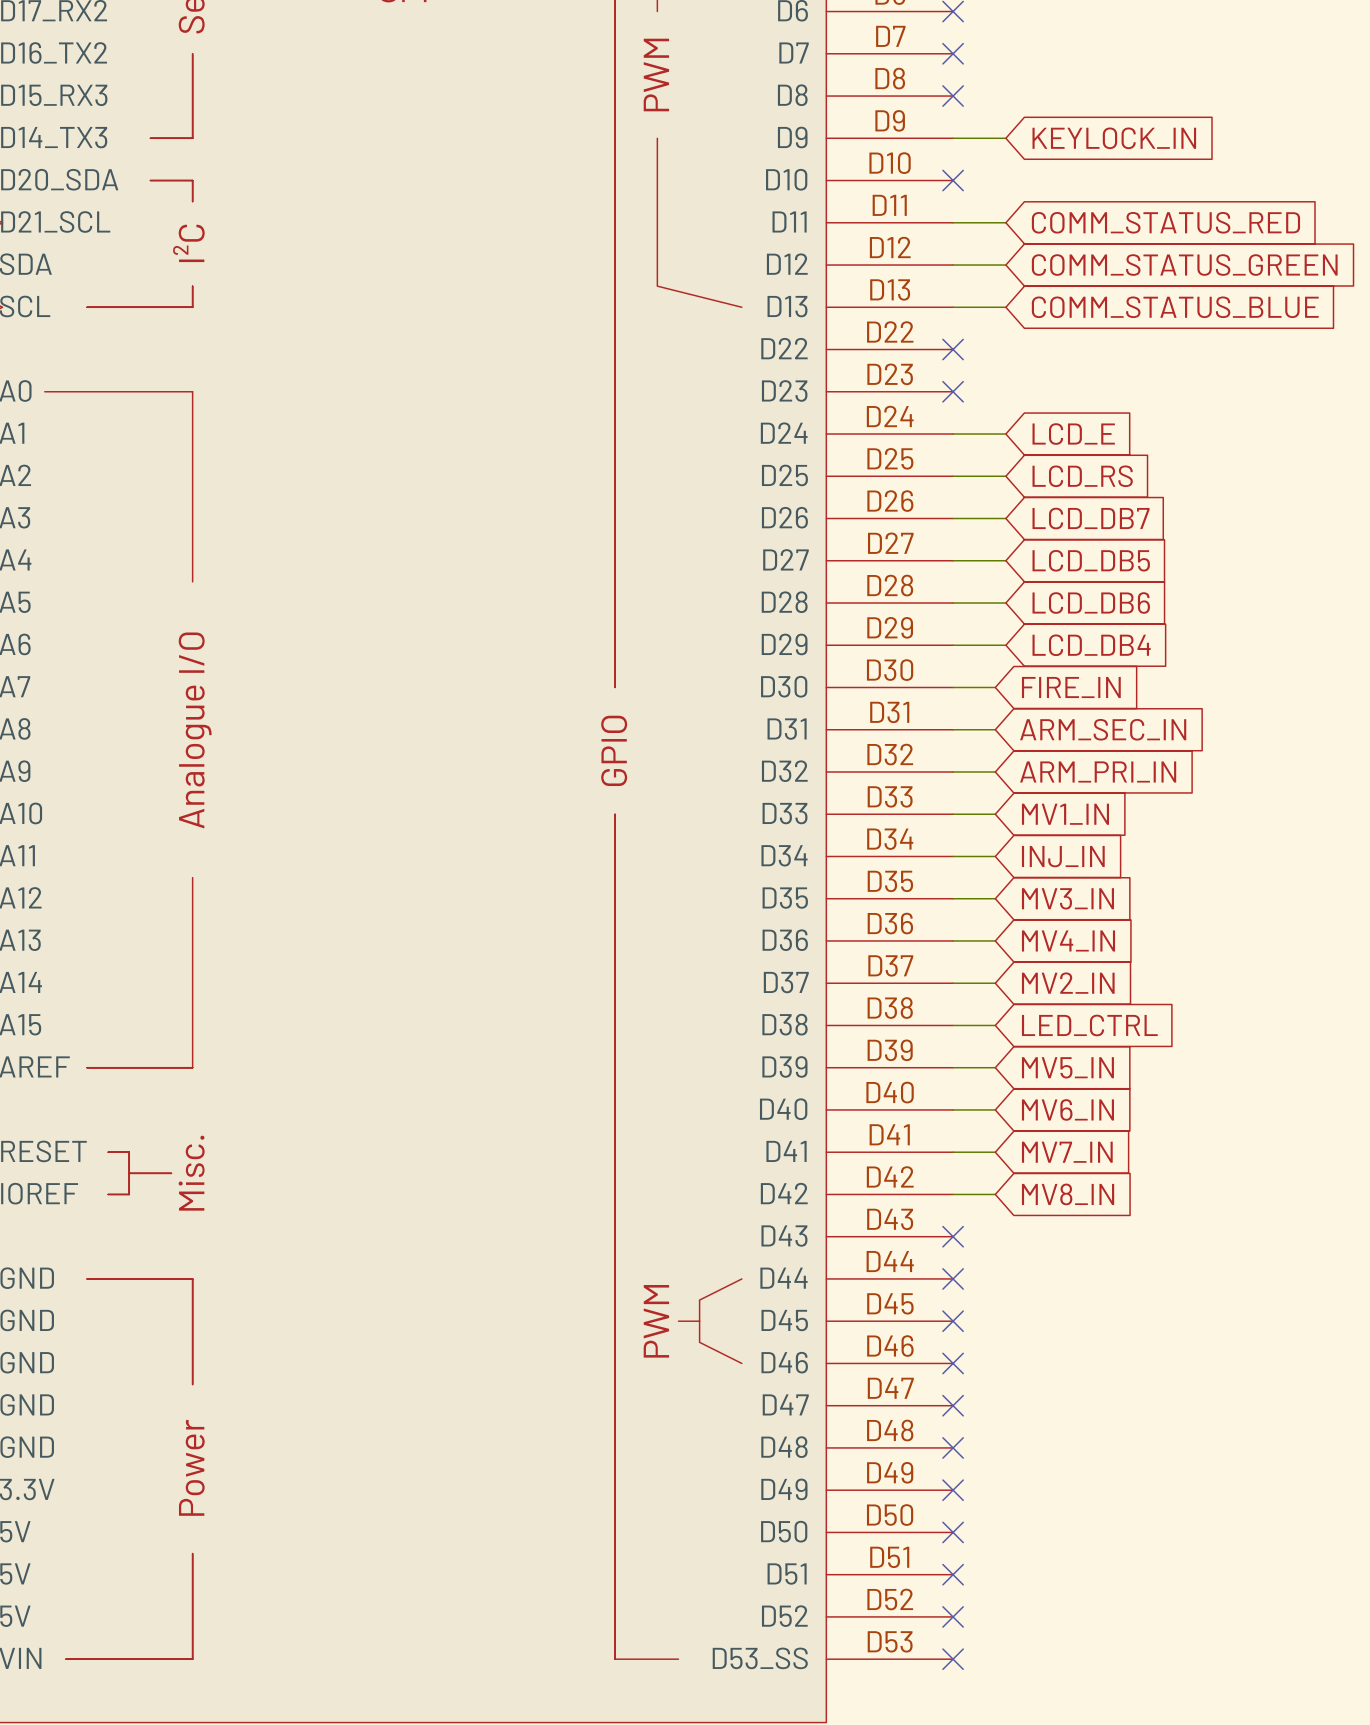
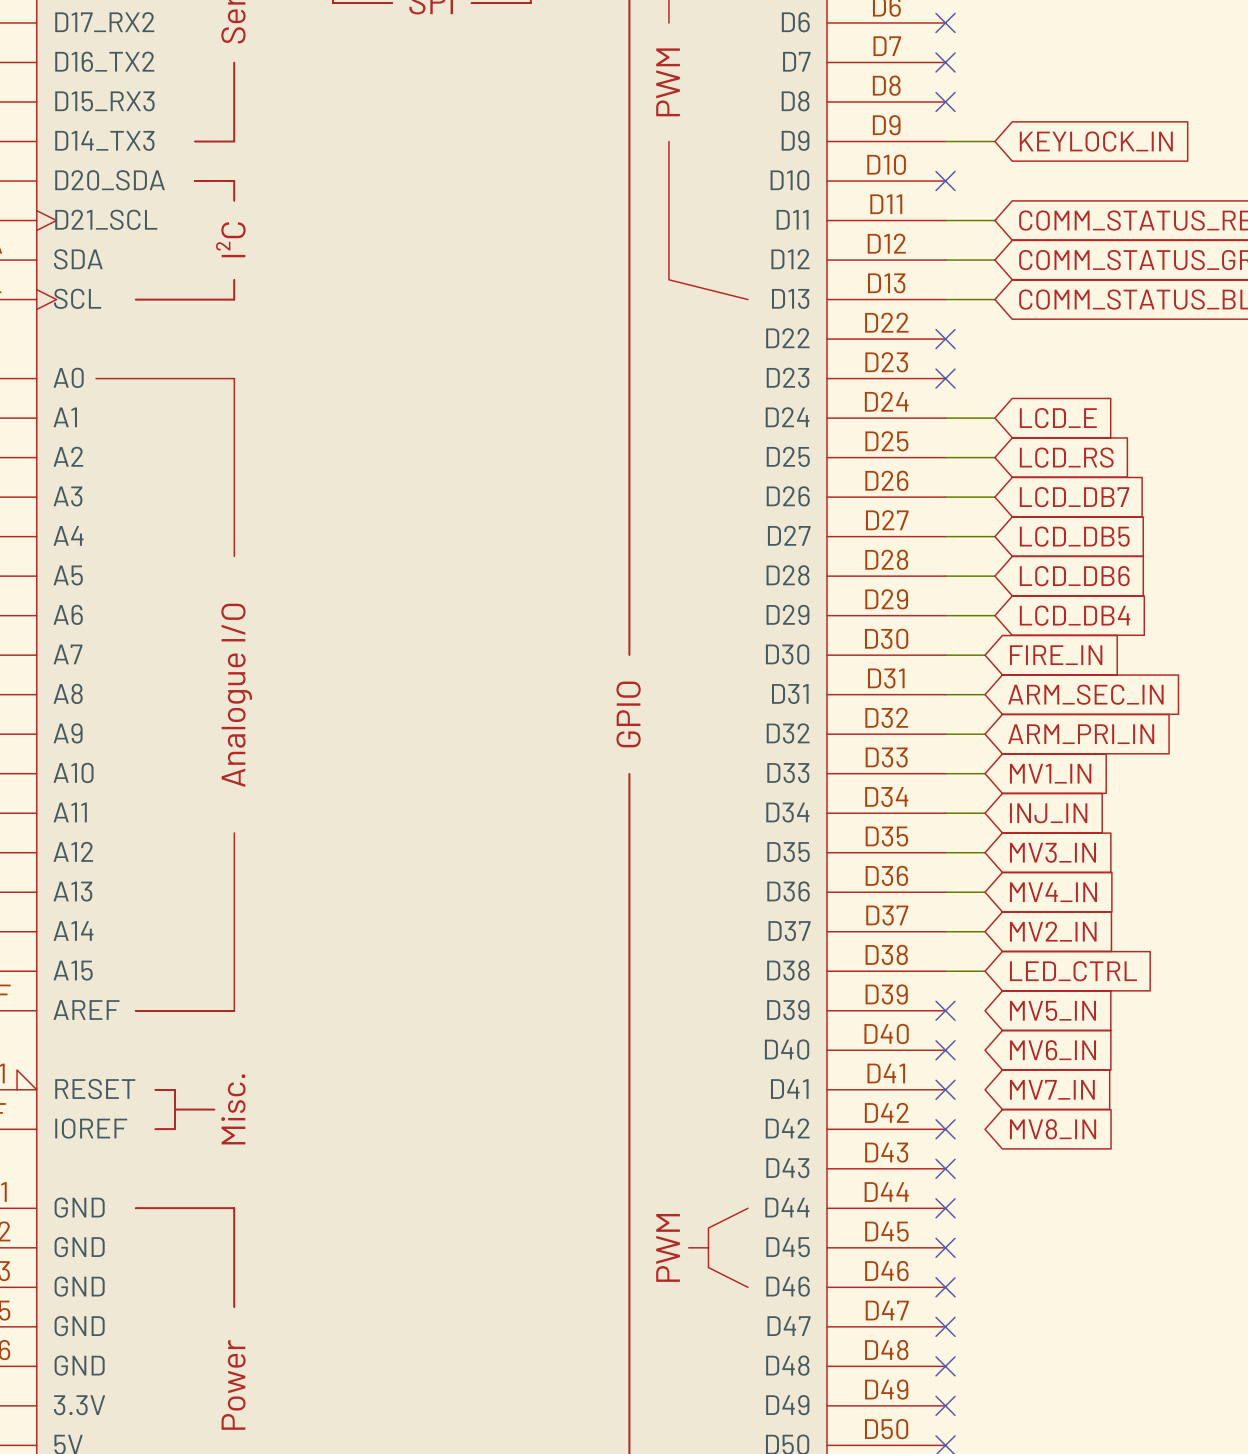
wire: (953, 1067) (995, 1067) -> none
no-connect mark: none -> (945, 1010)
wire: (953, 1109) (995, 1109) -> none
no-connect mark: none -> (945, 1050)
wire: (953, 1152) (995, 1152) -> none
no-connect mark: none -> (945, 1089)
wire: (953, 1194) (995, 1194) -> none
no-connect mark: none -> (945, 1129)

